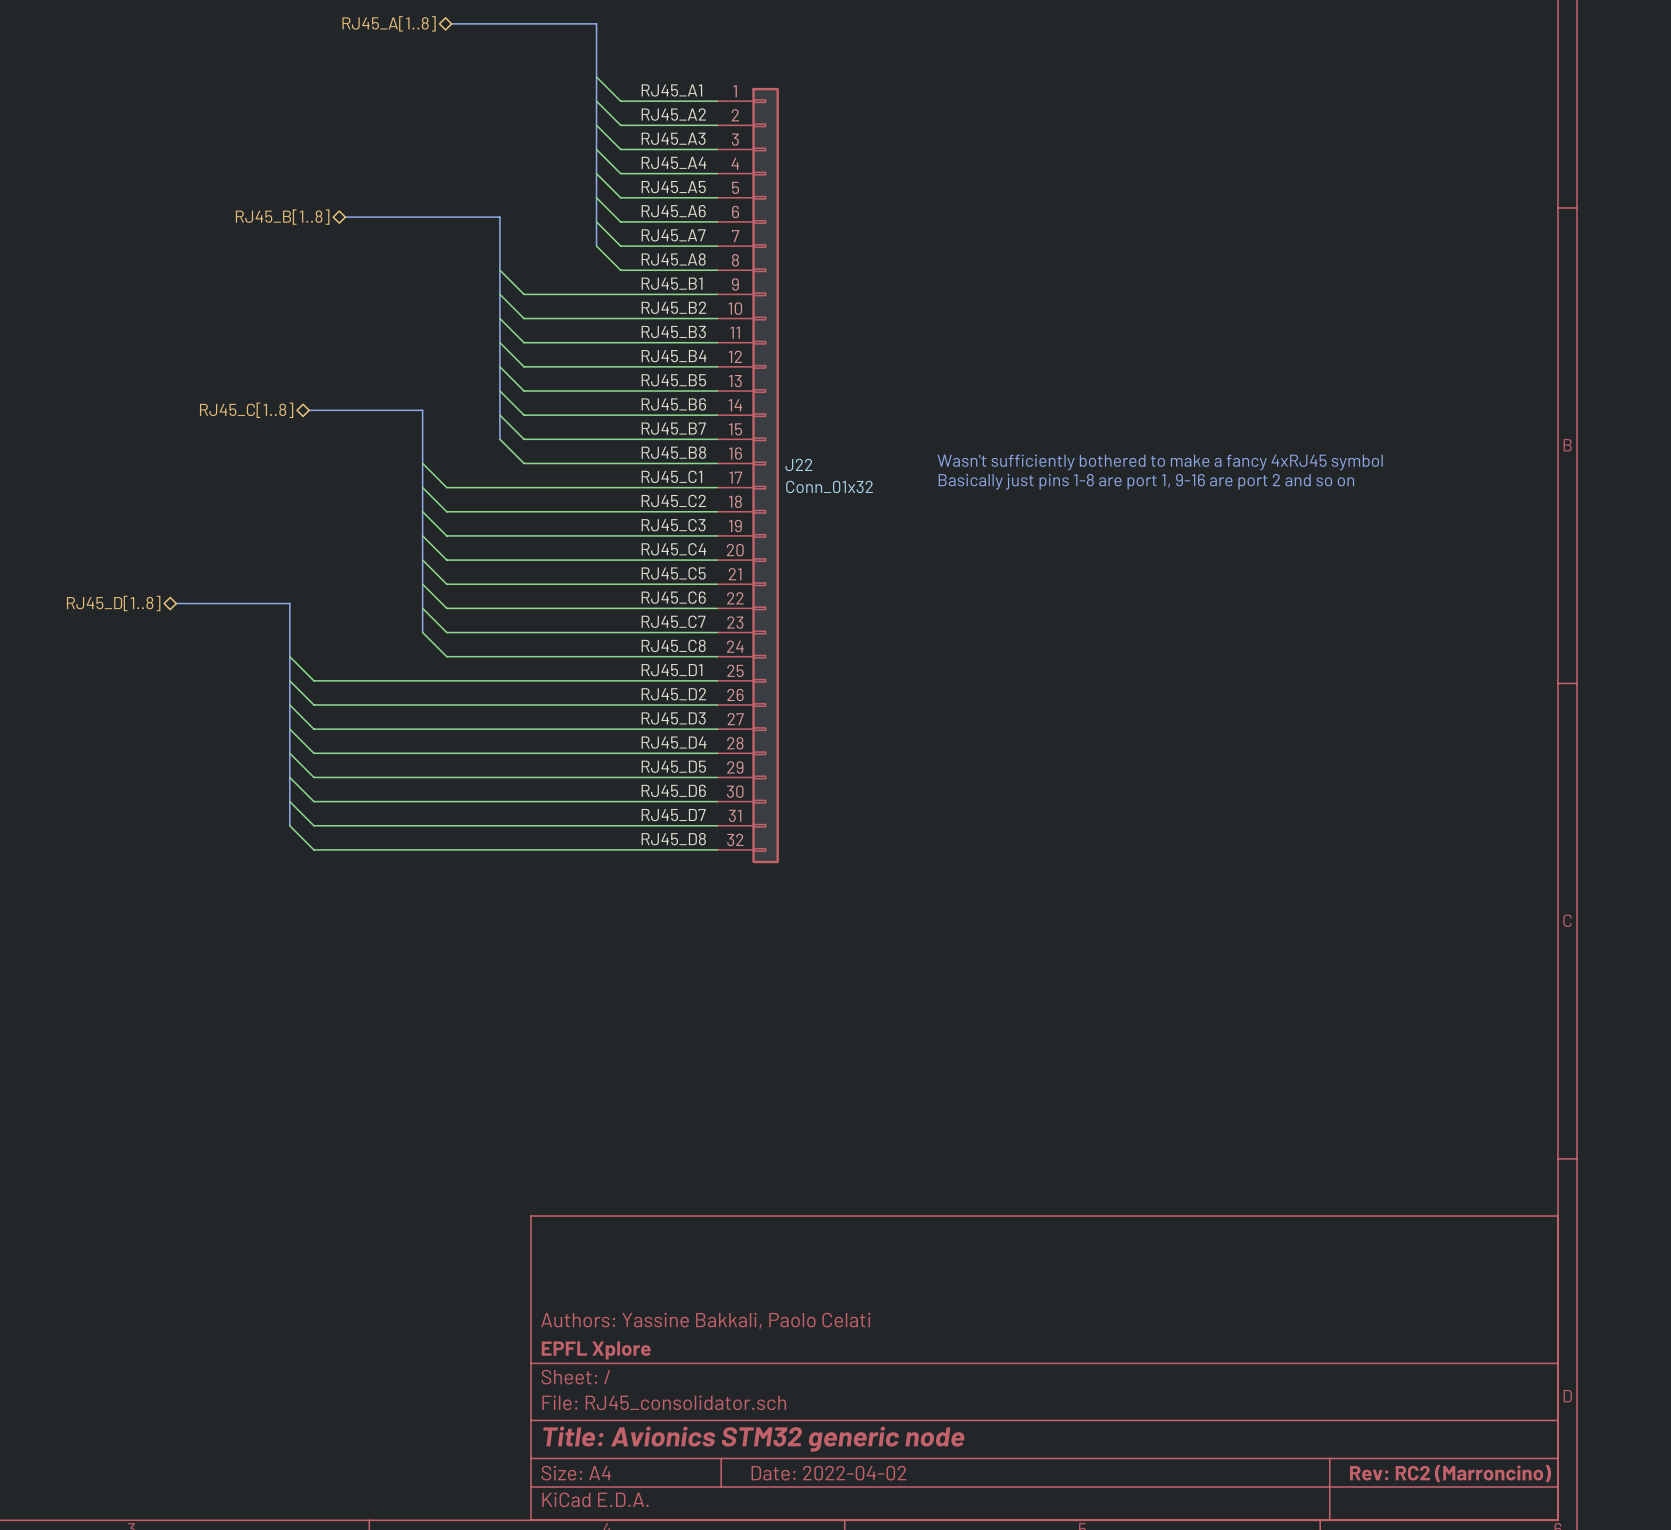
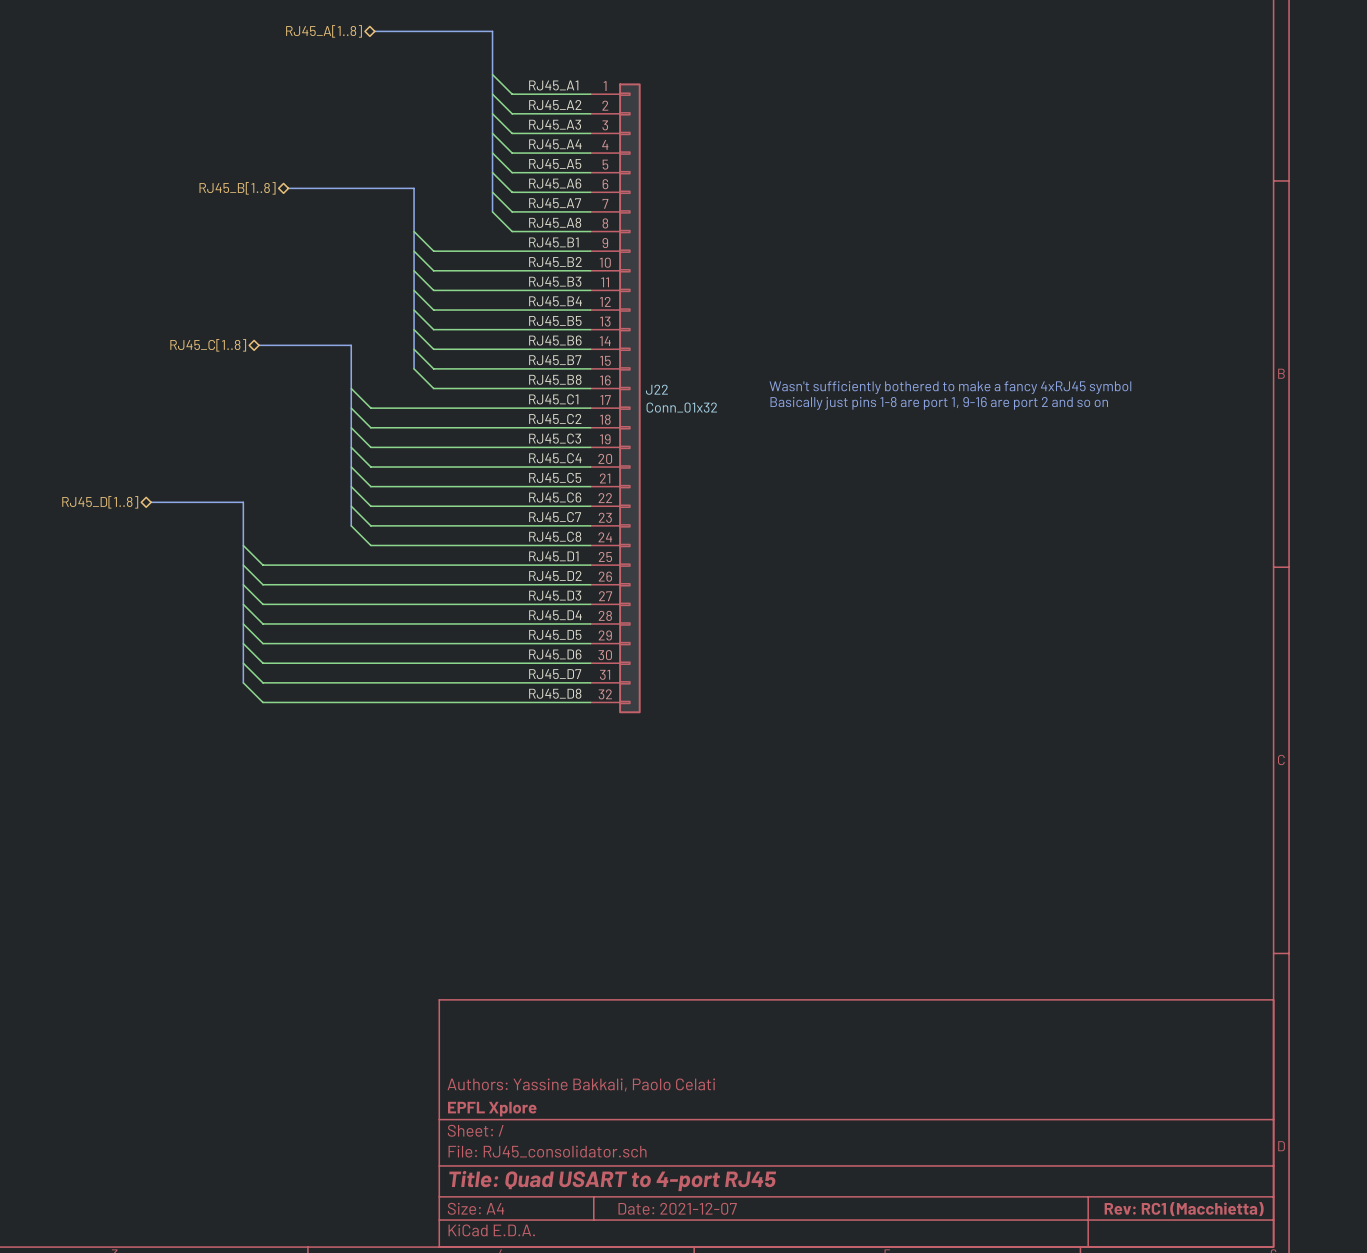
title block: Title: Avionics STM32 generic node (753, 1439) -> Title: Quad USART to 4-port RJ45 (612, 1181)
title block: Date: 2022-04-02 (828, 1473) -> Date: 2021-12-07 (677, 1208)
title block: Rev: RC2 (Marroncino) (1450, 1473) -> Rev: RC1 (Macchietta) (1184, 1209)

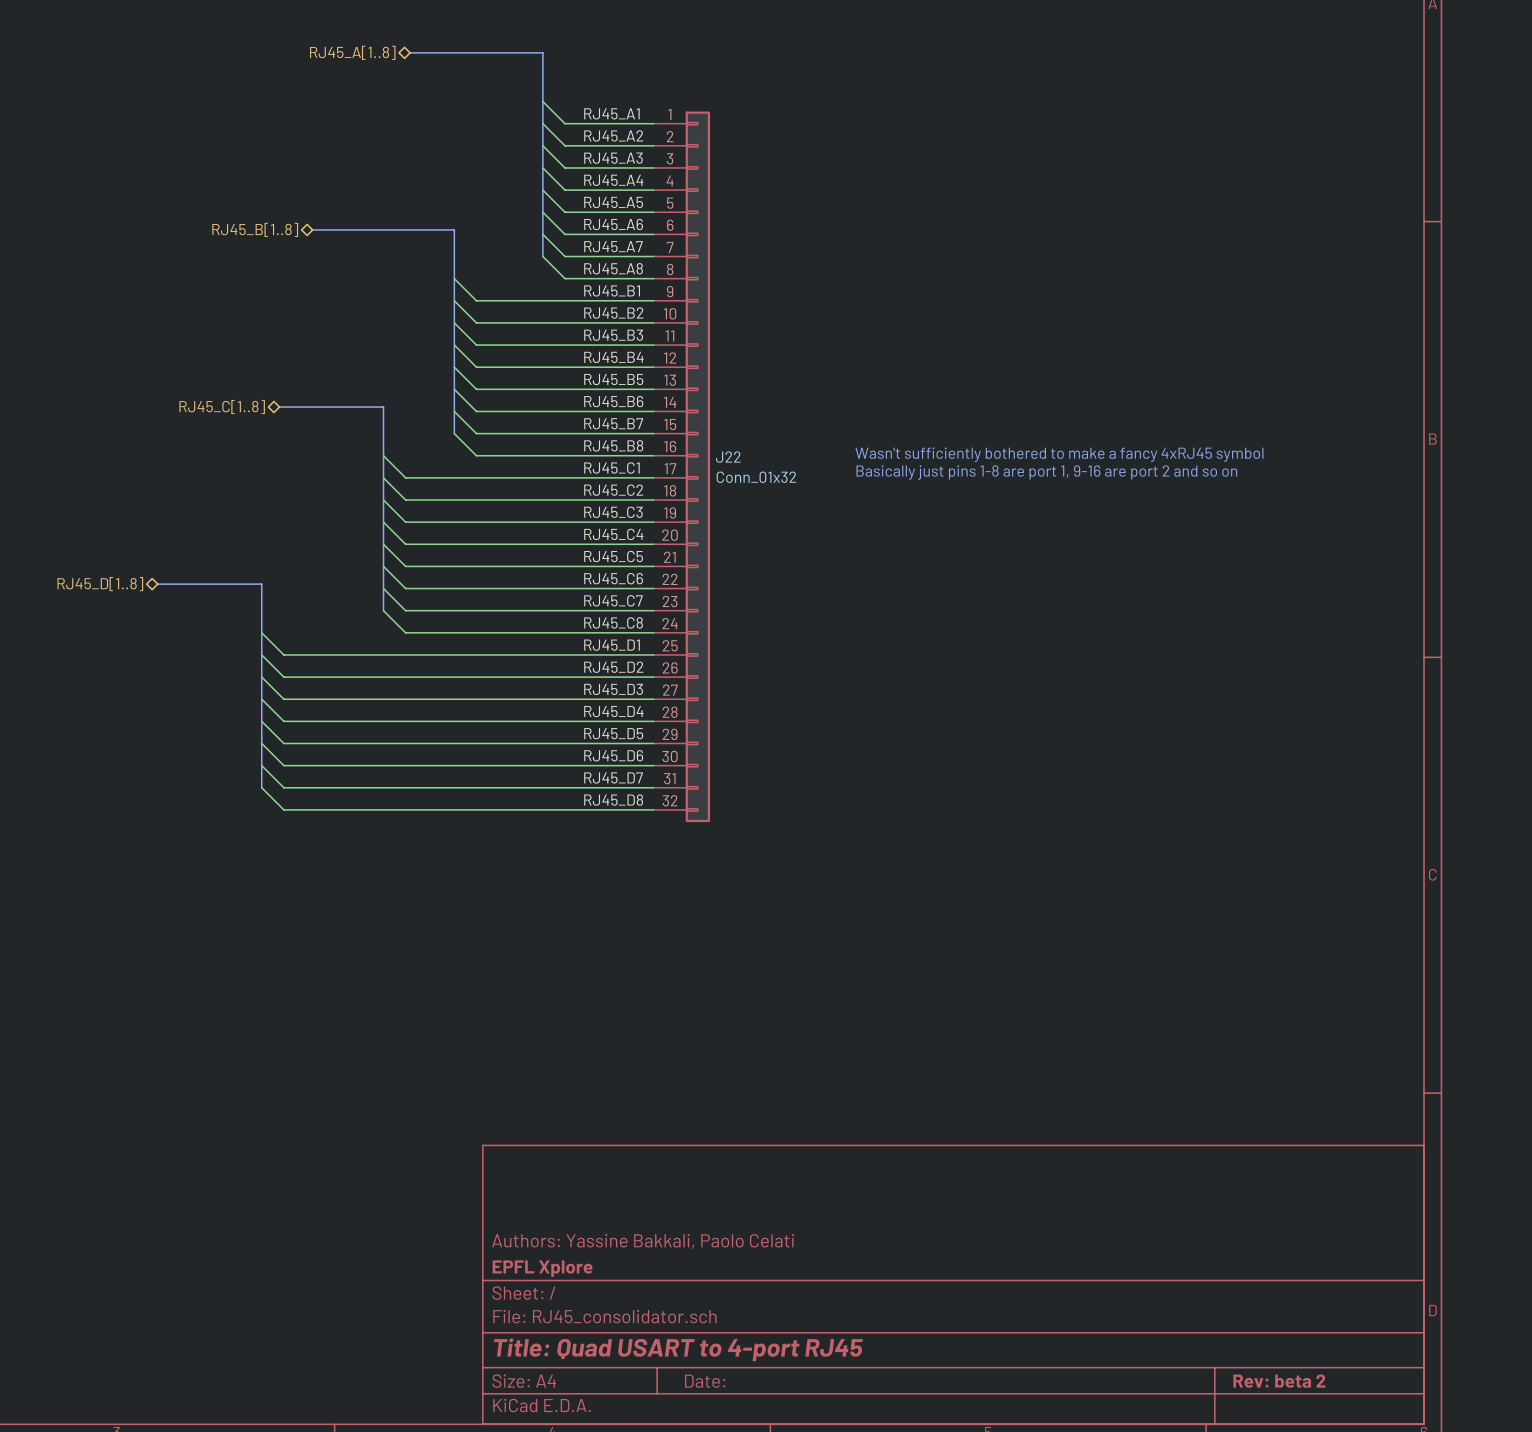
title block: Date: 2021-12-07 (677, 1208) -> Date: (705, 1381)
title block: Rev: RC1 (Macchietta) (1184, 1209) -> Rev: beta 2 (1279, 1381)

